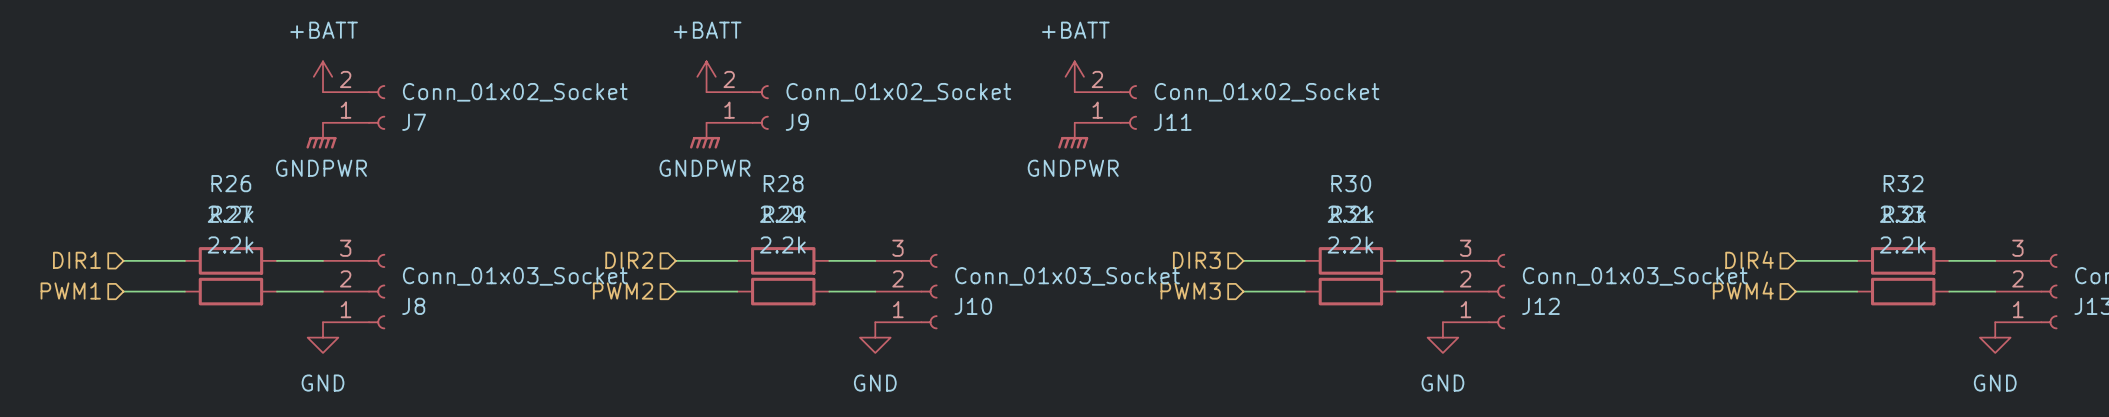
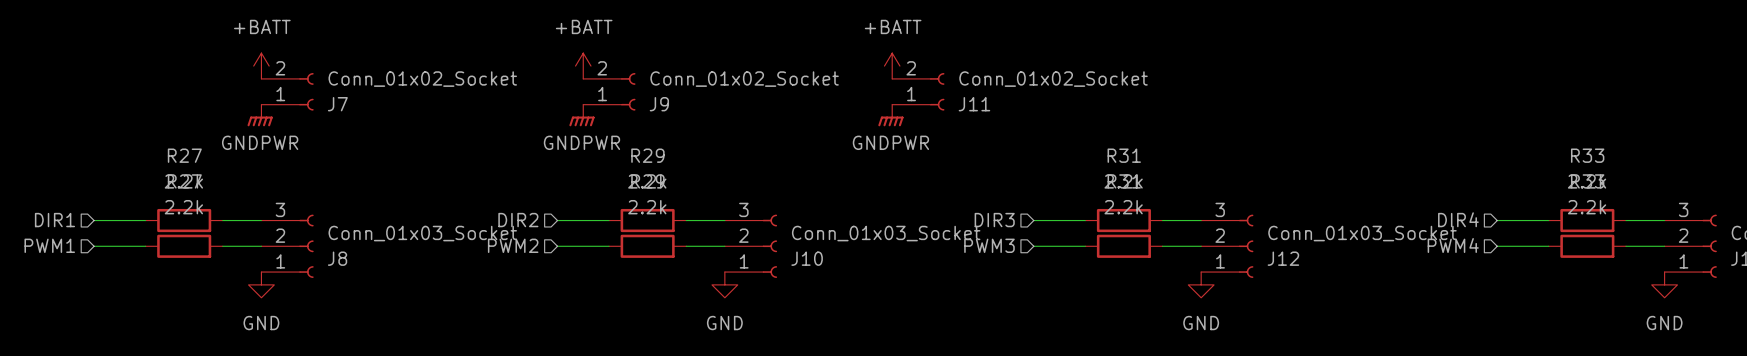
R26 name: R26 (231, 183) -> R27 (184, 155)
R28 name: R28 (783, 183) -> R29 (647, 155)
R30 name: R30 (1351, 183) -> R31 (1124, 155)
R32 name: R32 (1903, 183) -> R33 (1587, 155)

